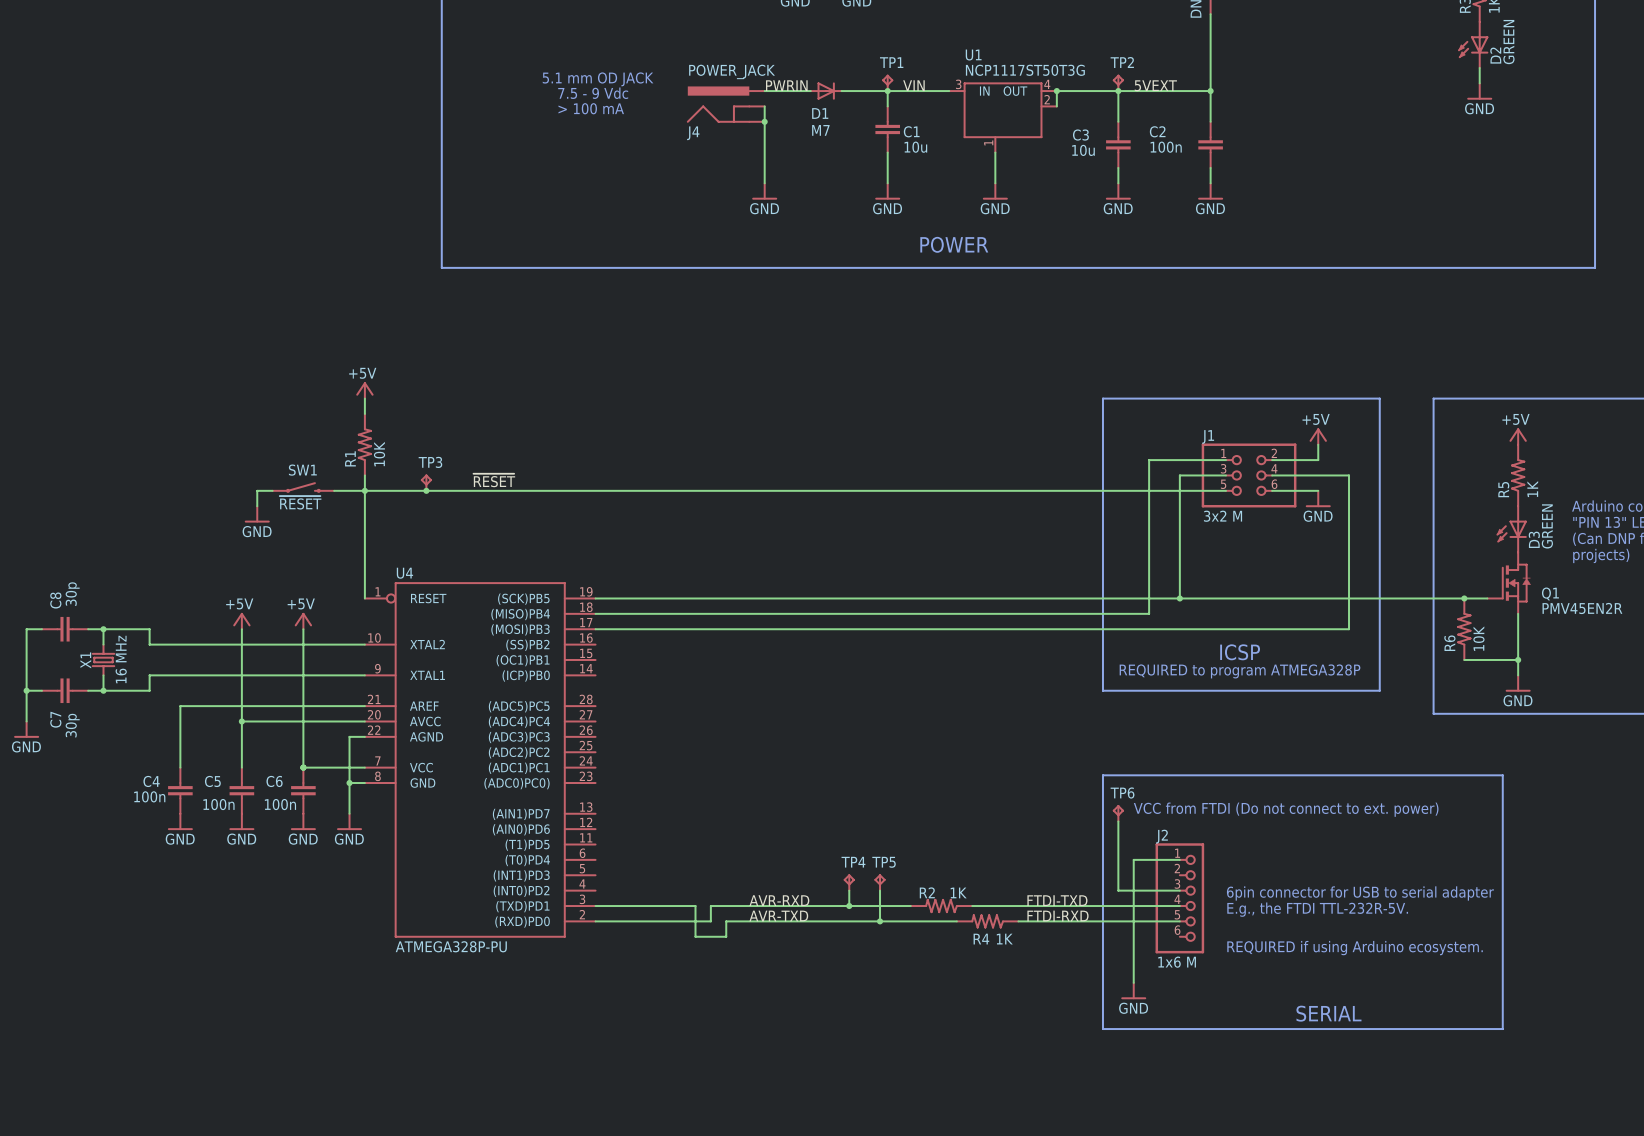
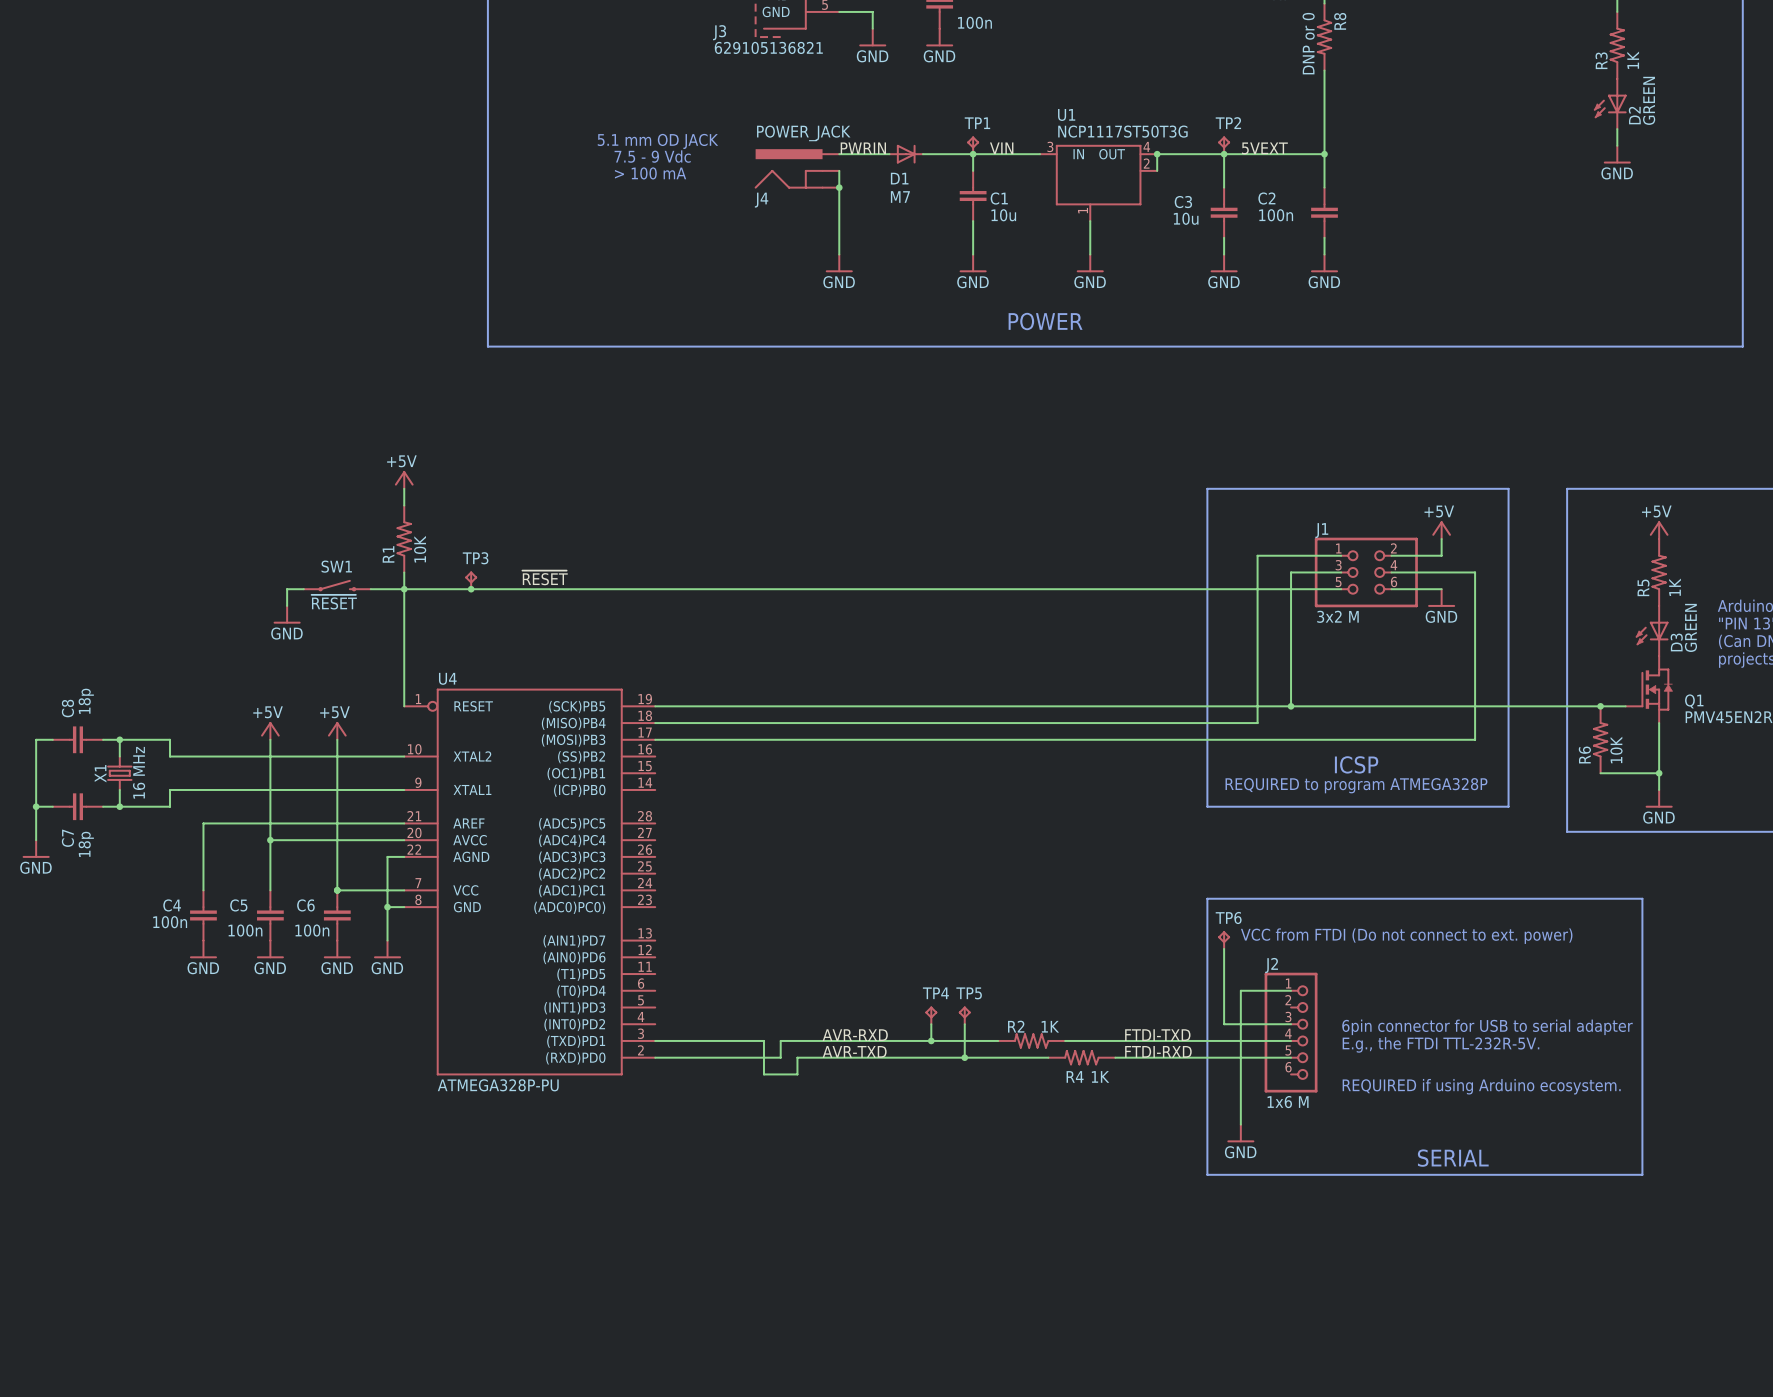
C8 value: 30p (72, 594) -> 18p (86, 701)
C7 value: 30p (72, 725) -> 18p (86, 844)

